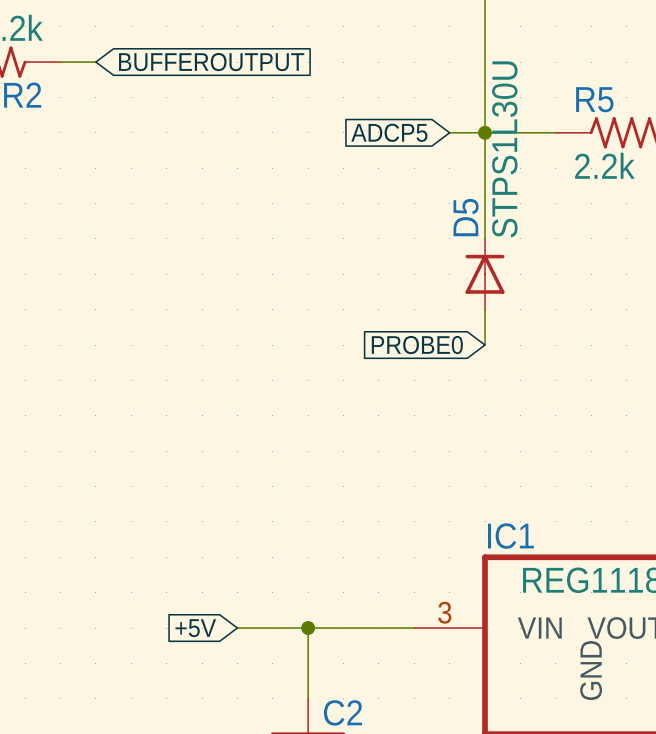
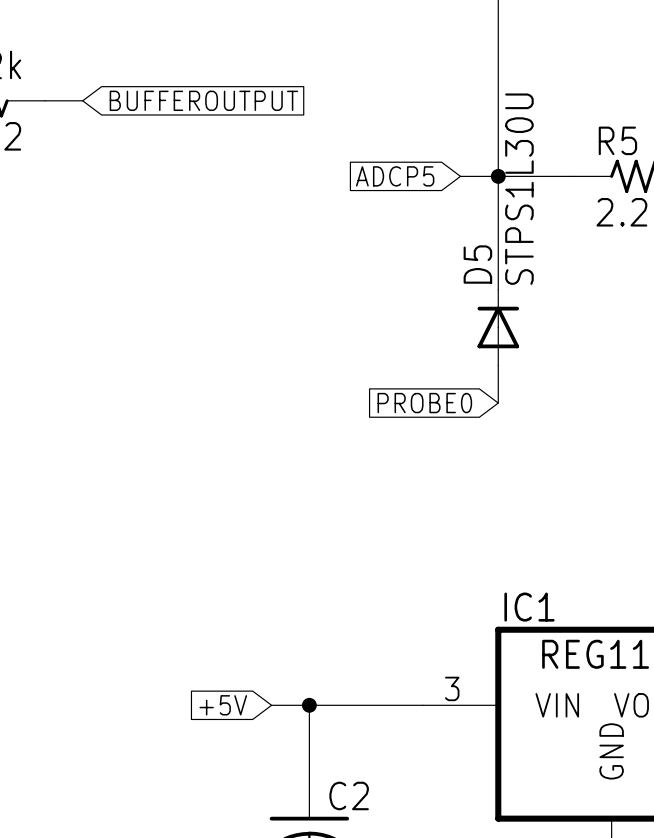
global label position: +5V (195, 628) -> +5V (223, 705)
wire: (237, 628) (272, 628) -> none

